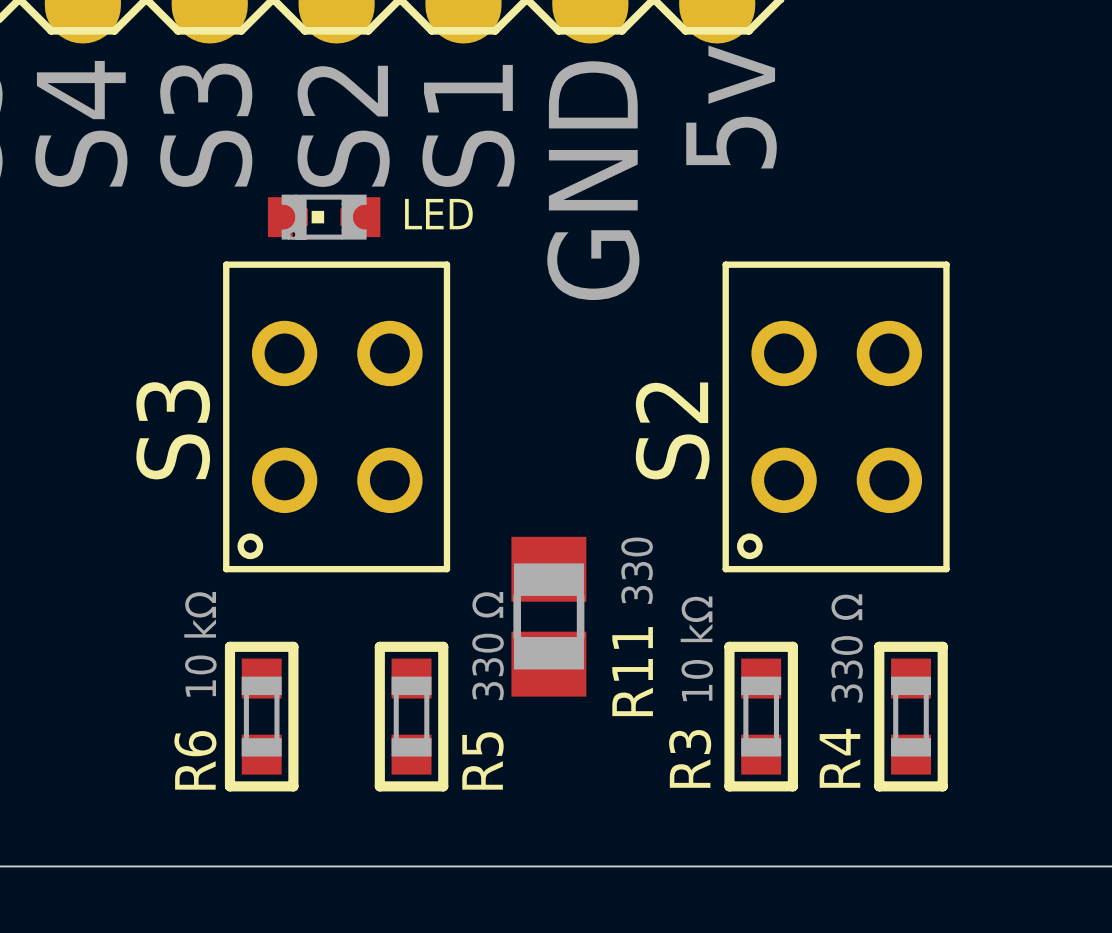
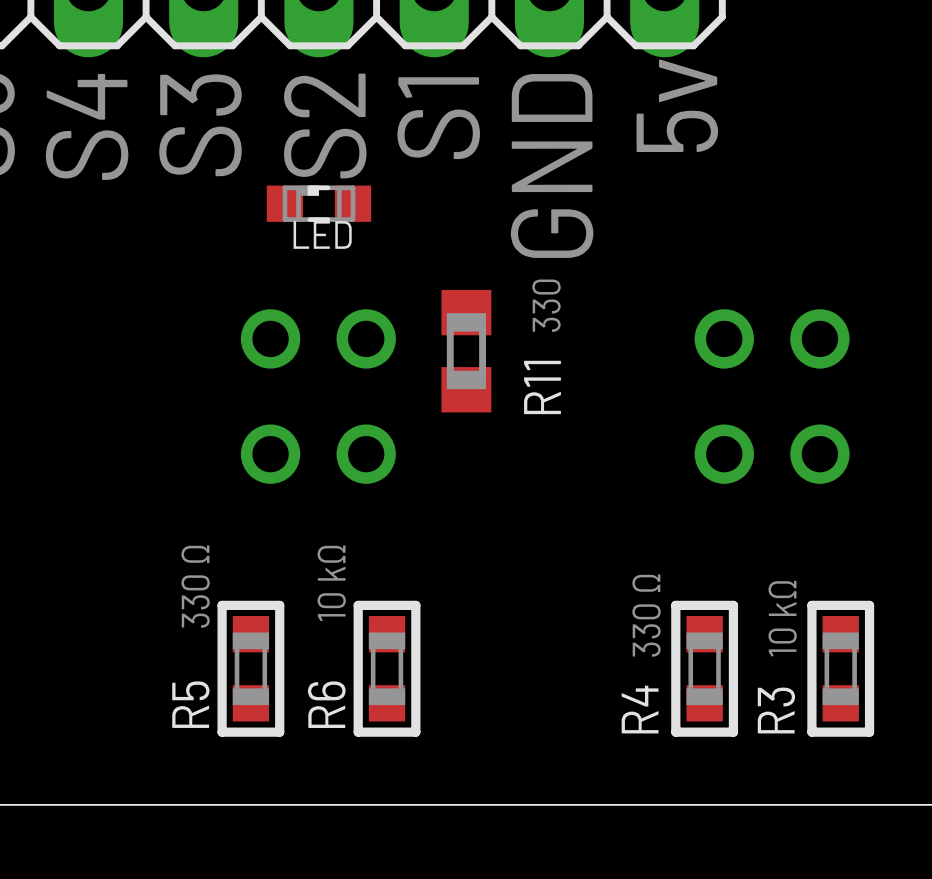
LED footprint: [267, 194, 381, 240] -> [266, 185, 372, 222]
LED name position: LED (438, 214) -> LED (322, 235)
S3 side: top (336, 416) -> bottom (318, 396)
S2 side: top (836, 416) -> bottom (772, 396)
R11 footprint: [511, 536, 587, 697] -> [441, 289, 492, 413]
R6 value: 10 kΩ (200, 644) -> 330 Ω (195, 586)
R5 value: 330 Ω (488, 646) -> 10 kΩ (331, 583)
R3 value: 10 kΩ (696, 648) -> 330 Ω (646, 615)
R4 value: 330 Ω (847, 648) -> 10 kΩ (782, 618)
R3 name: R3 (690, 758) -> R4 (640, 709)
R4 name: R4 (839, 758) -> R3 (776, 710)
R6 name: R6 (195, 760) -> R5 (190, 704)
R5 name: R5 (482, 760) -> R6 (326, 704)

